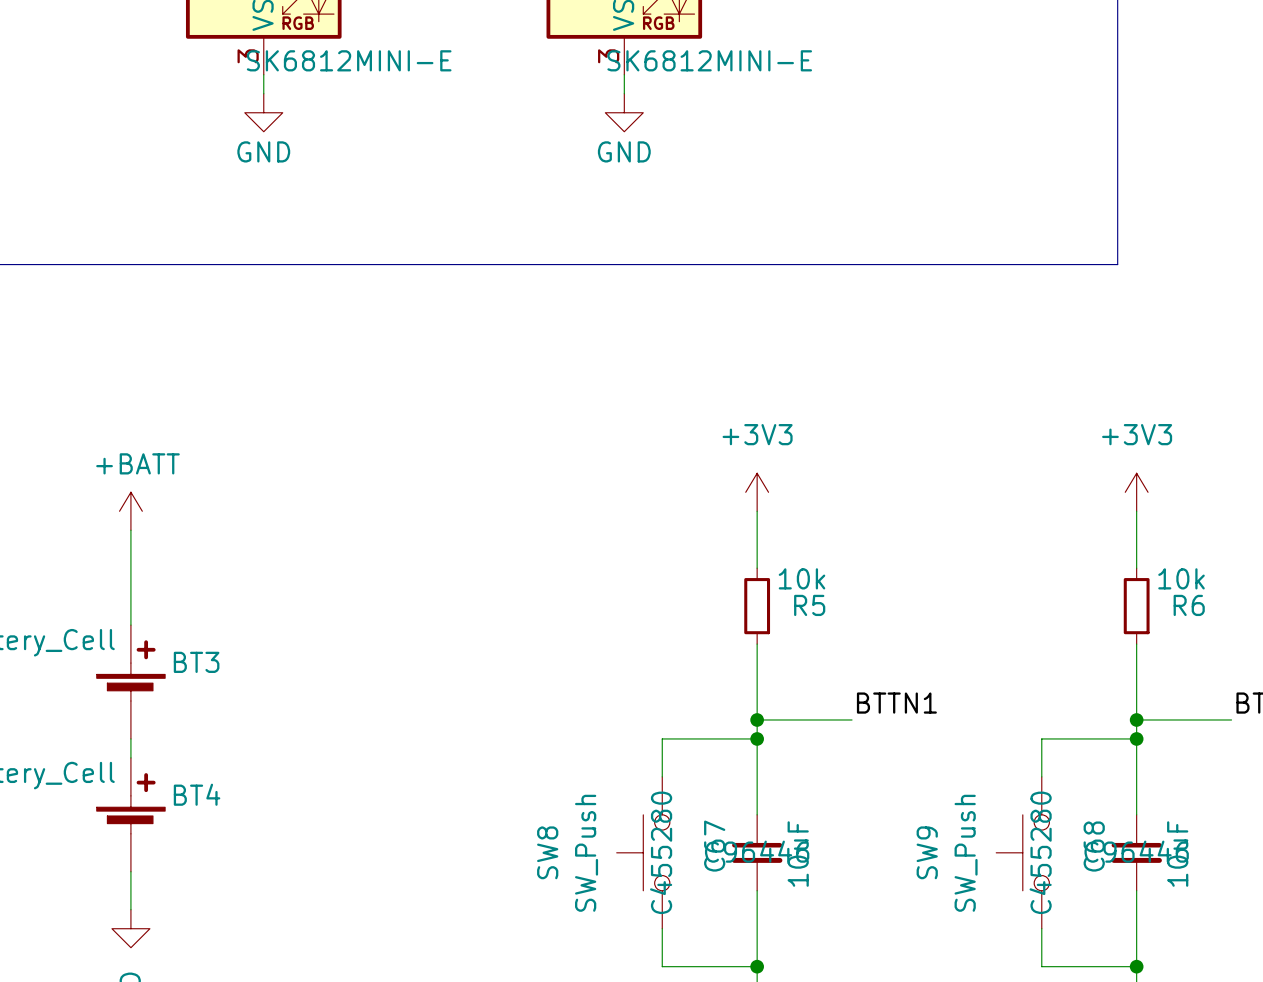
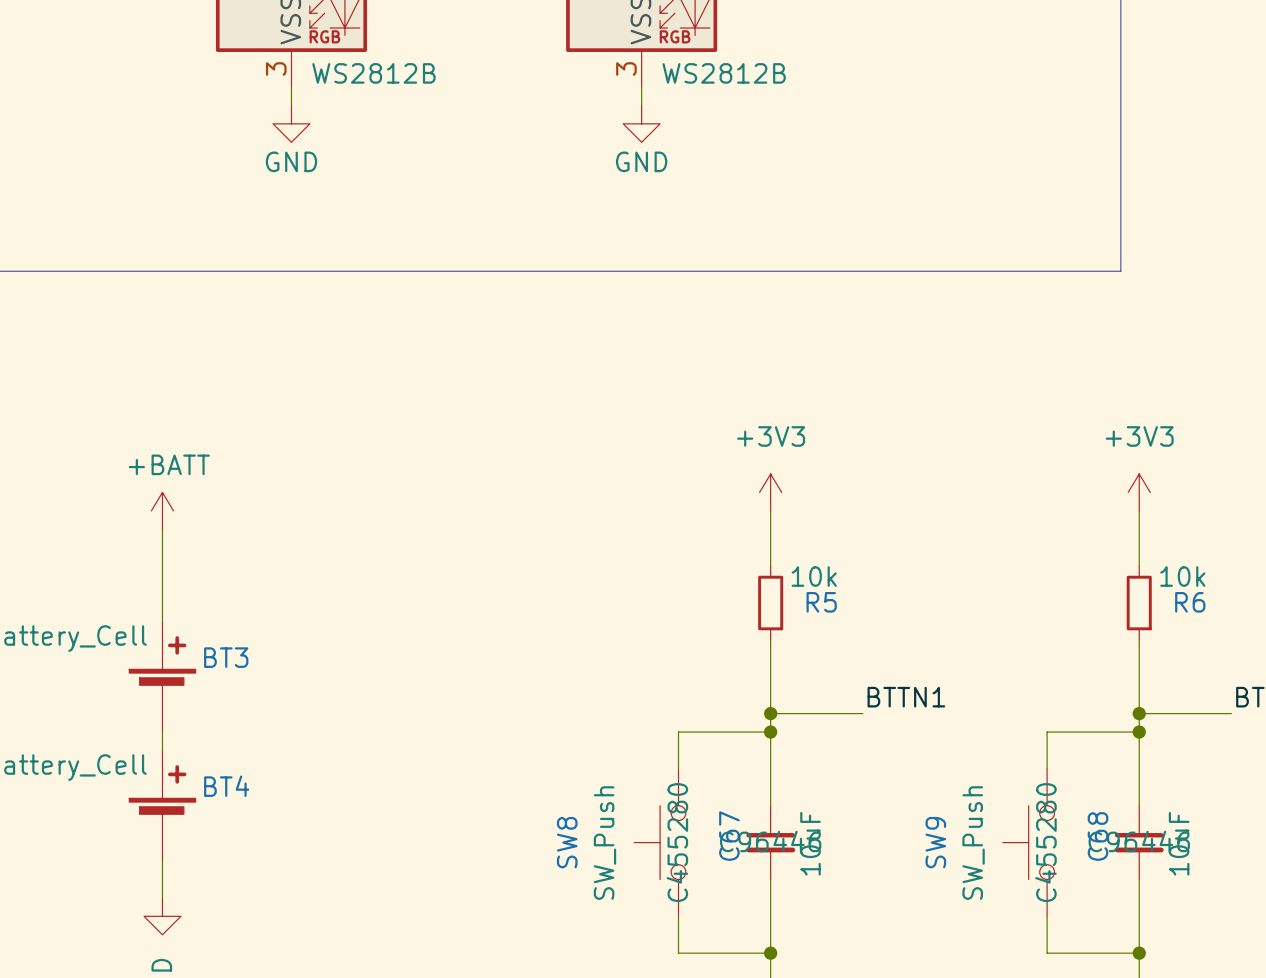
part value: SK6812MINI-E (349, 60) -> WS2812B (373, 73)
part value: SK6812MINI-E (709, 60) -> WS2812B (724, 73)

